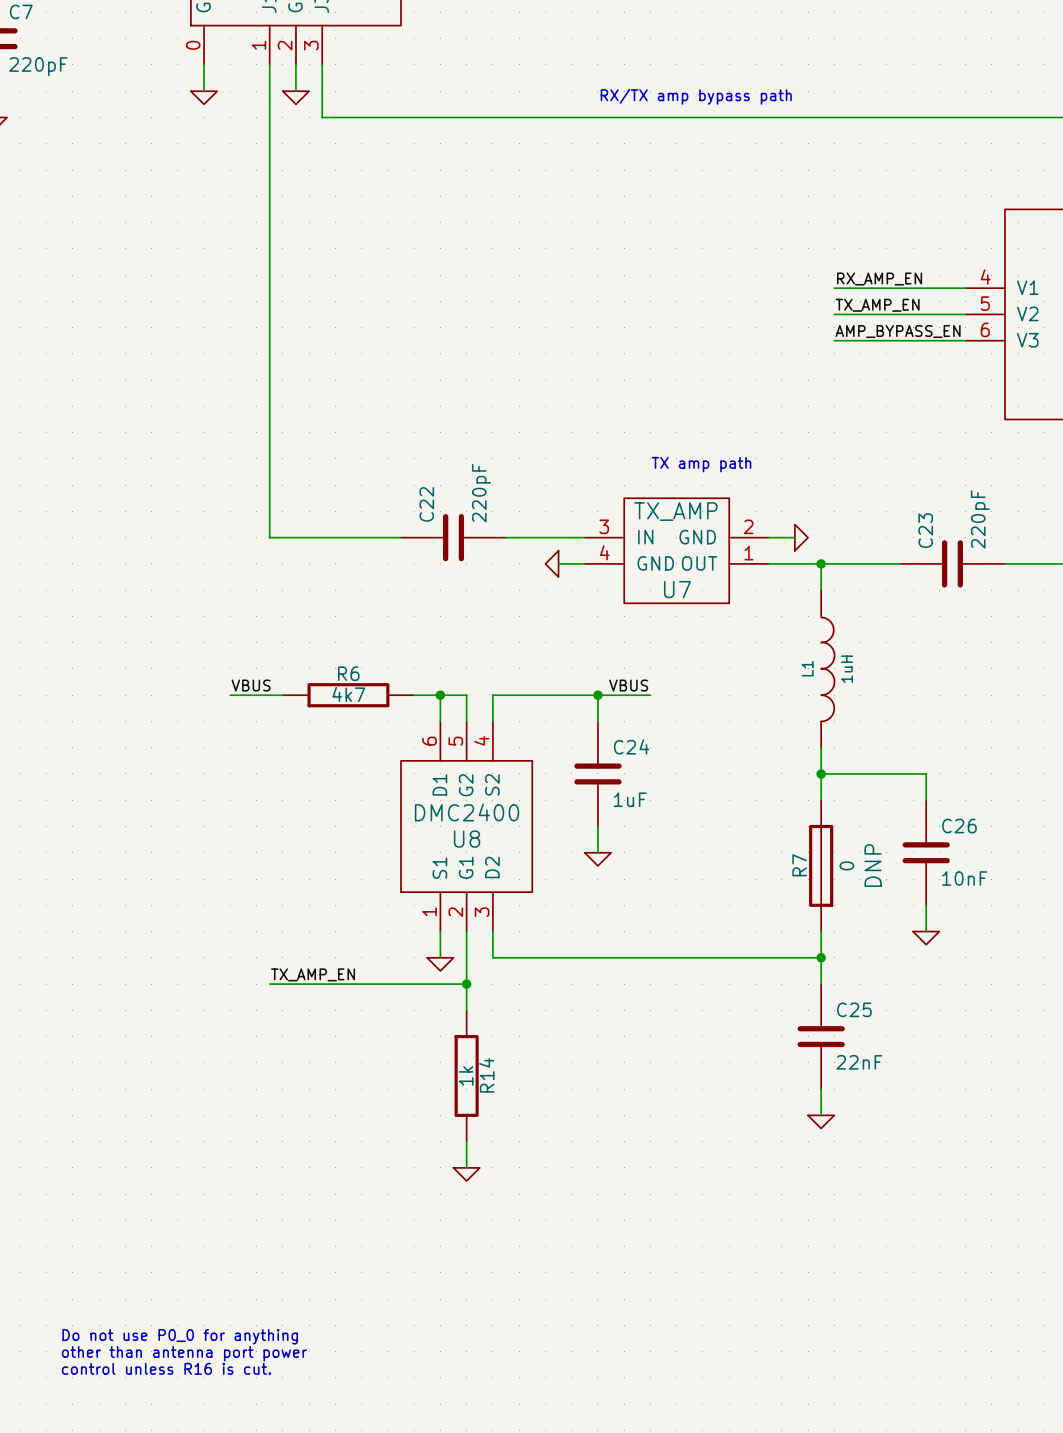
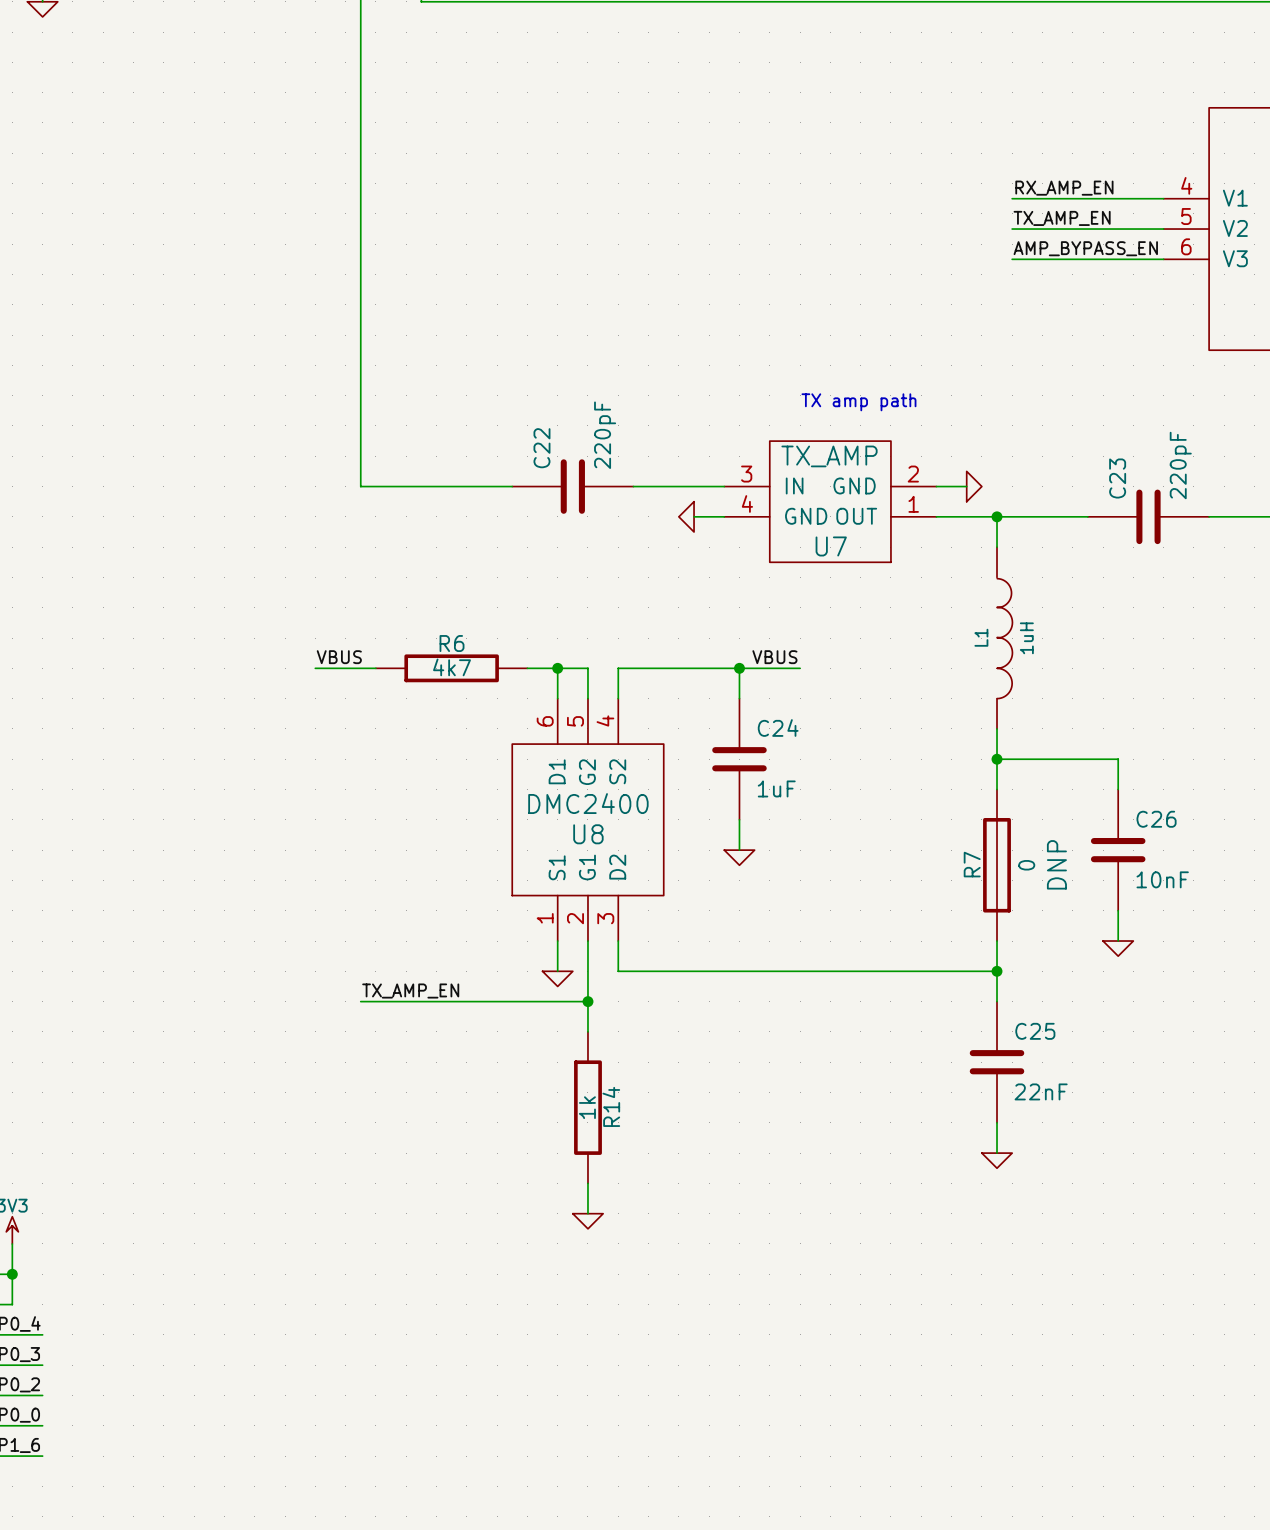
text: Do not use P0_0 for anything (180, 1336) -> none
text: other than antenna port power (184, 1353) -> none
text: control unless R16 is cut. (166, 1368) -> none

